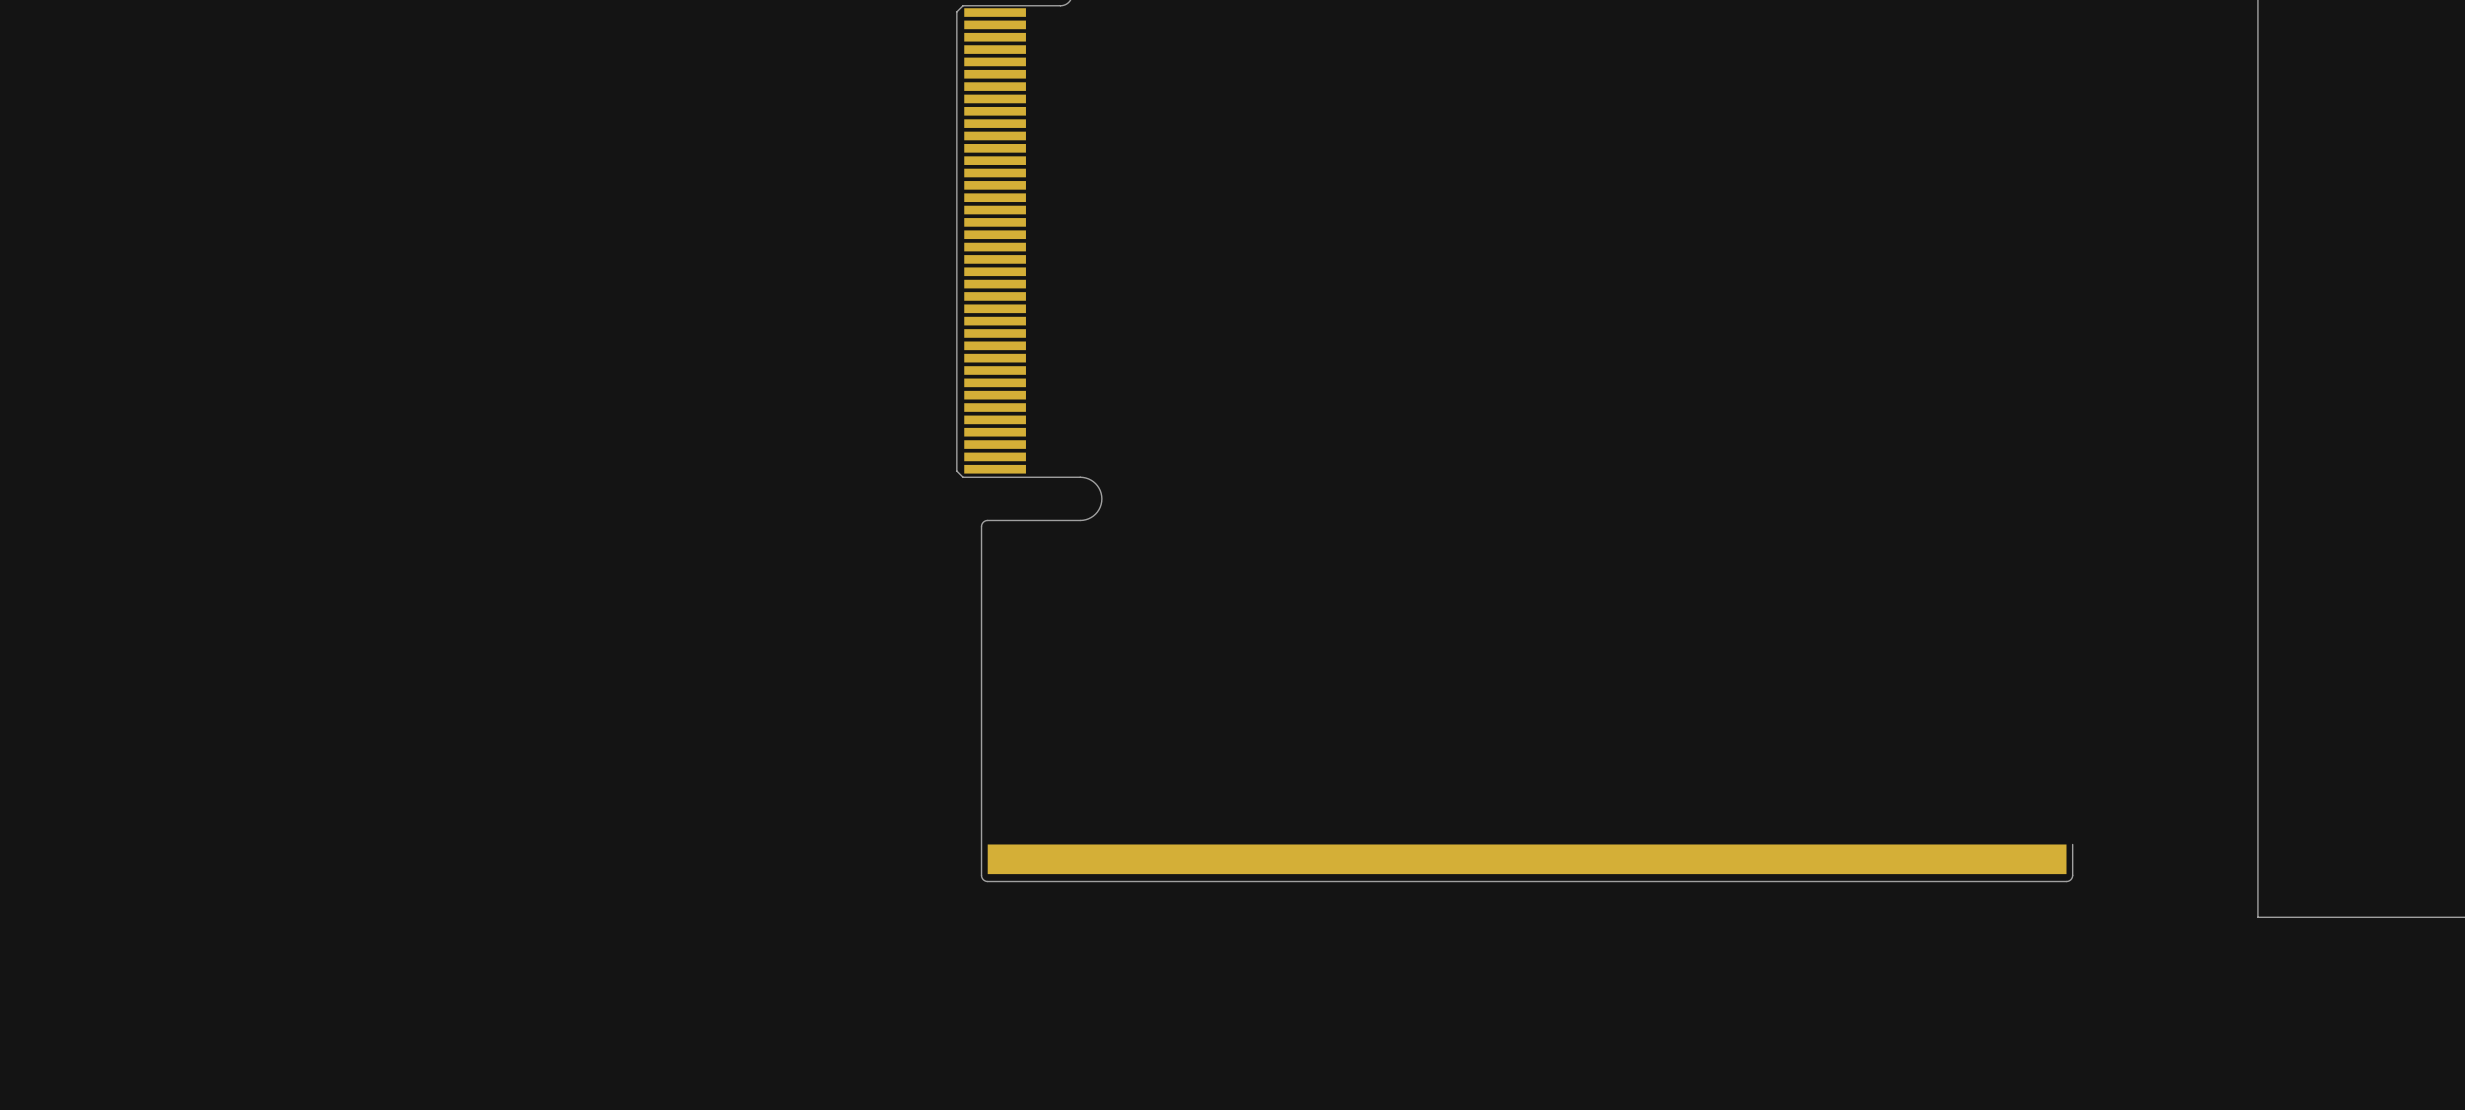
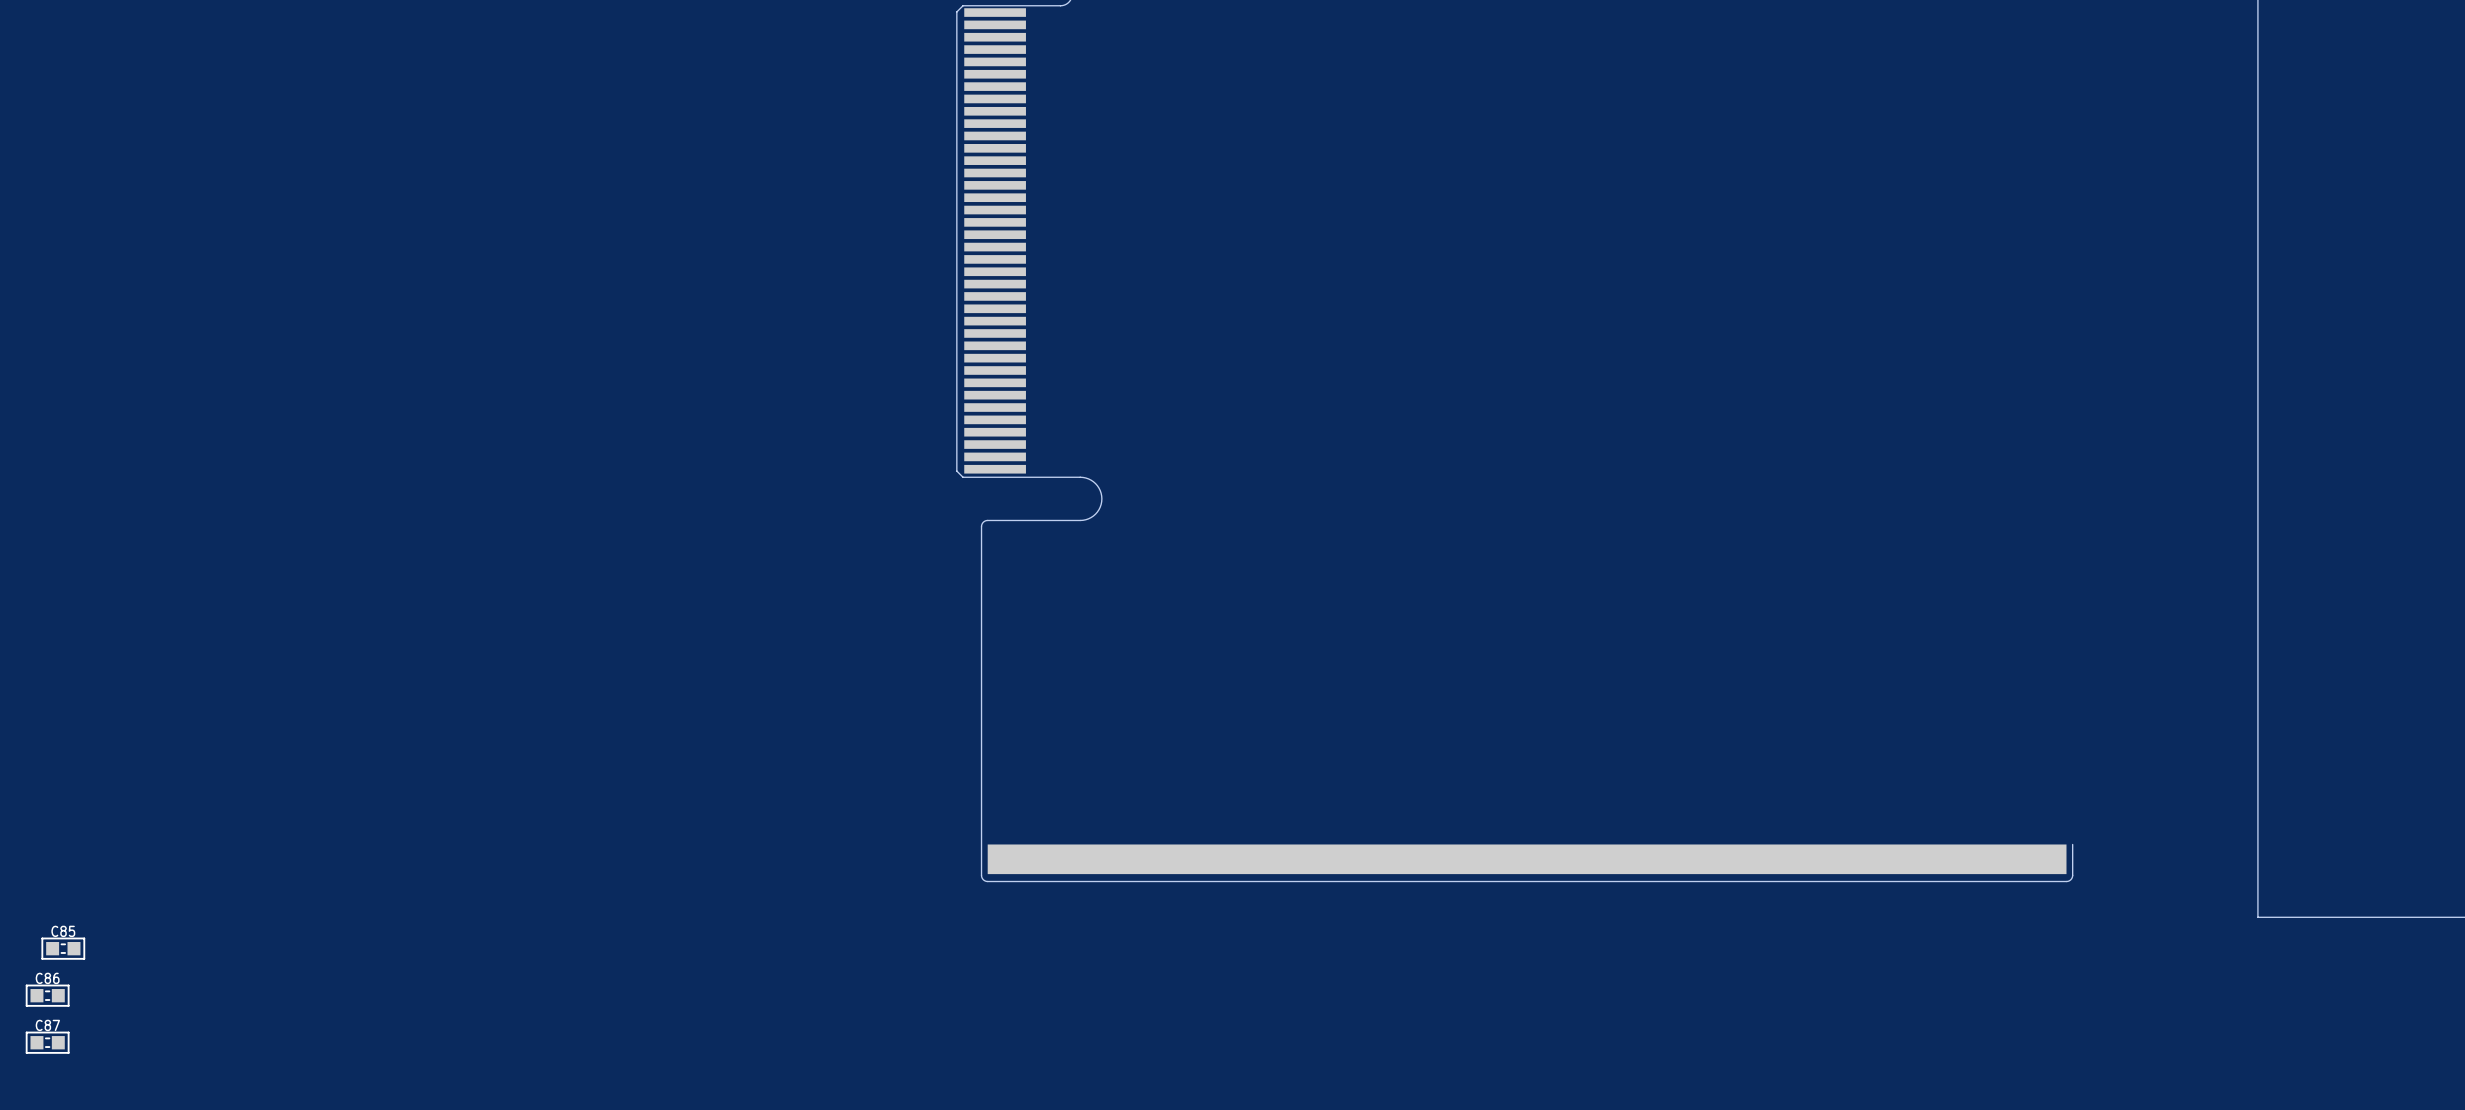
C85: none -> (63, 948)
C86: none -> (47, 995)
C87: none -> (47, 1042)

